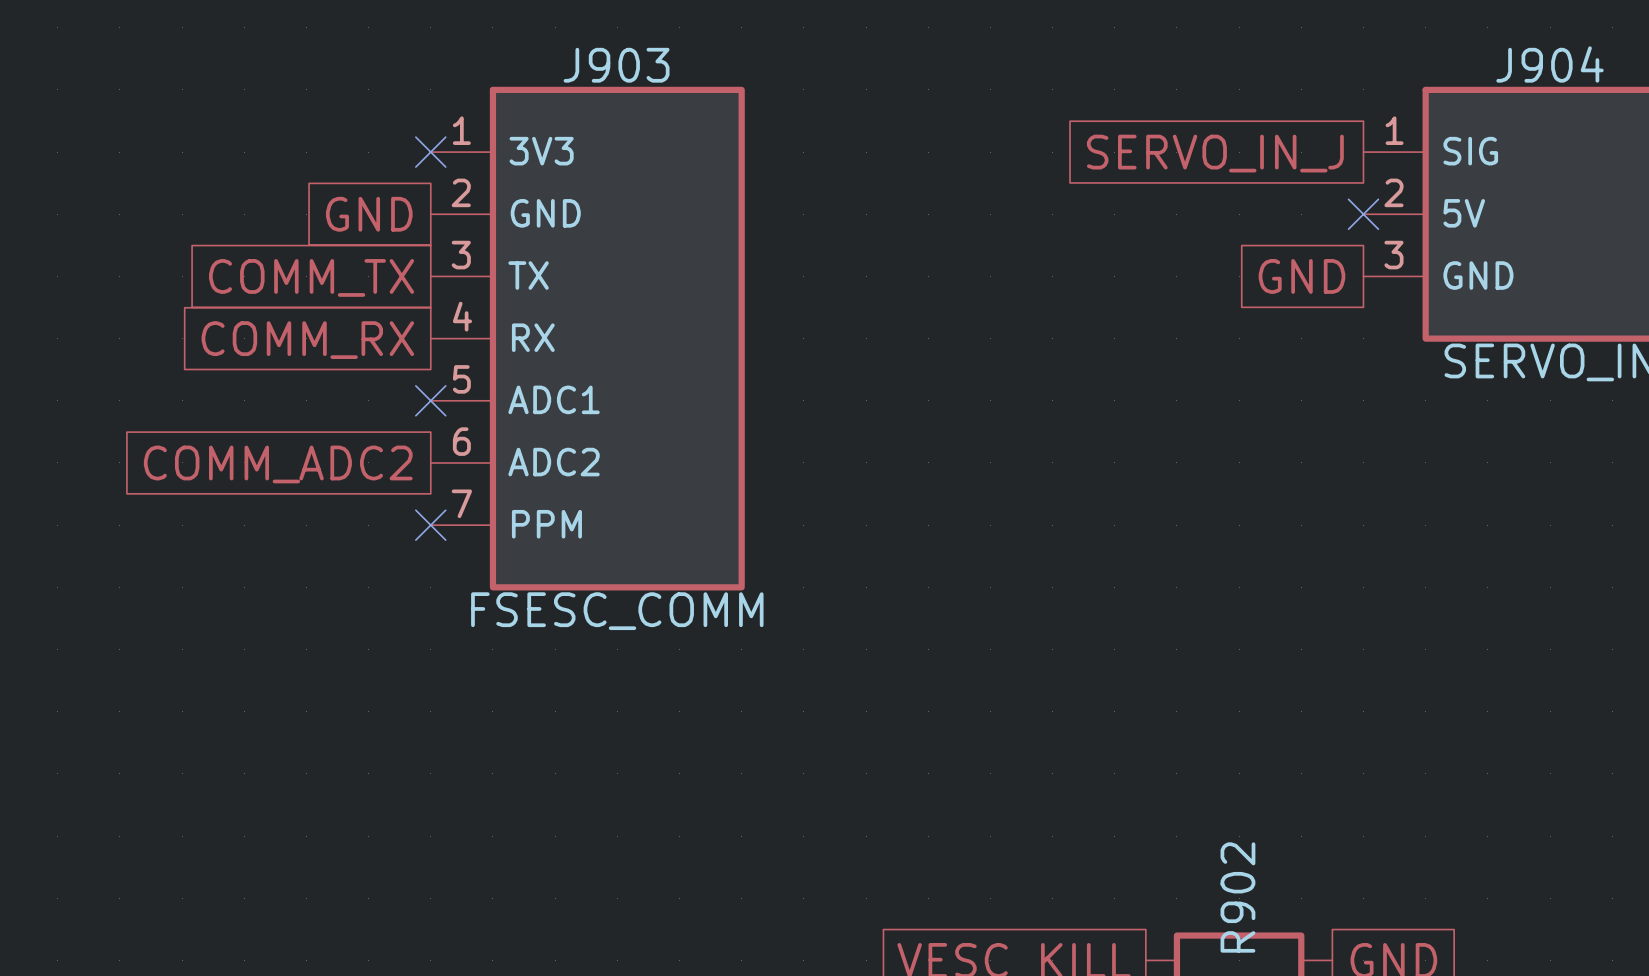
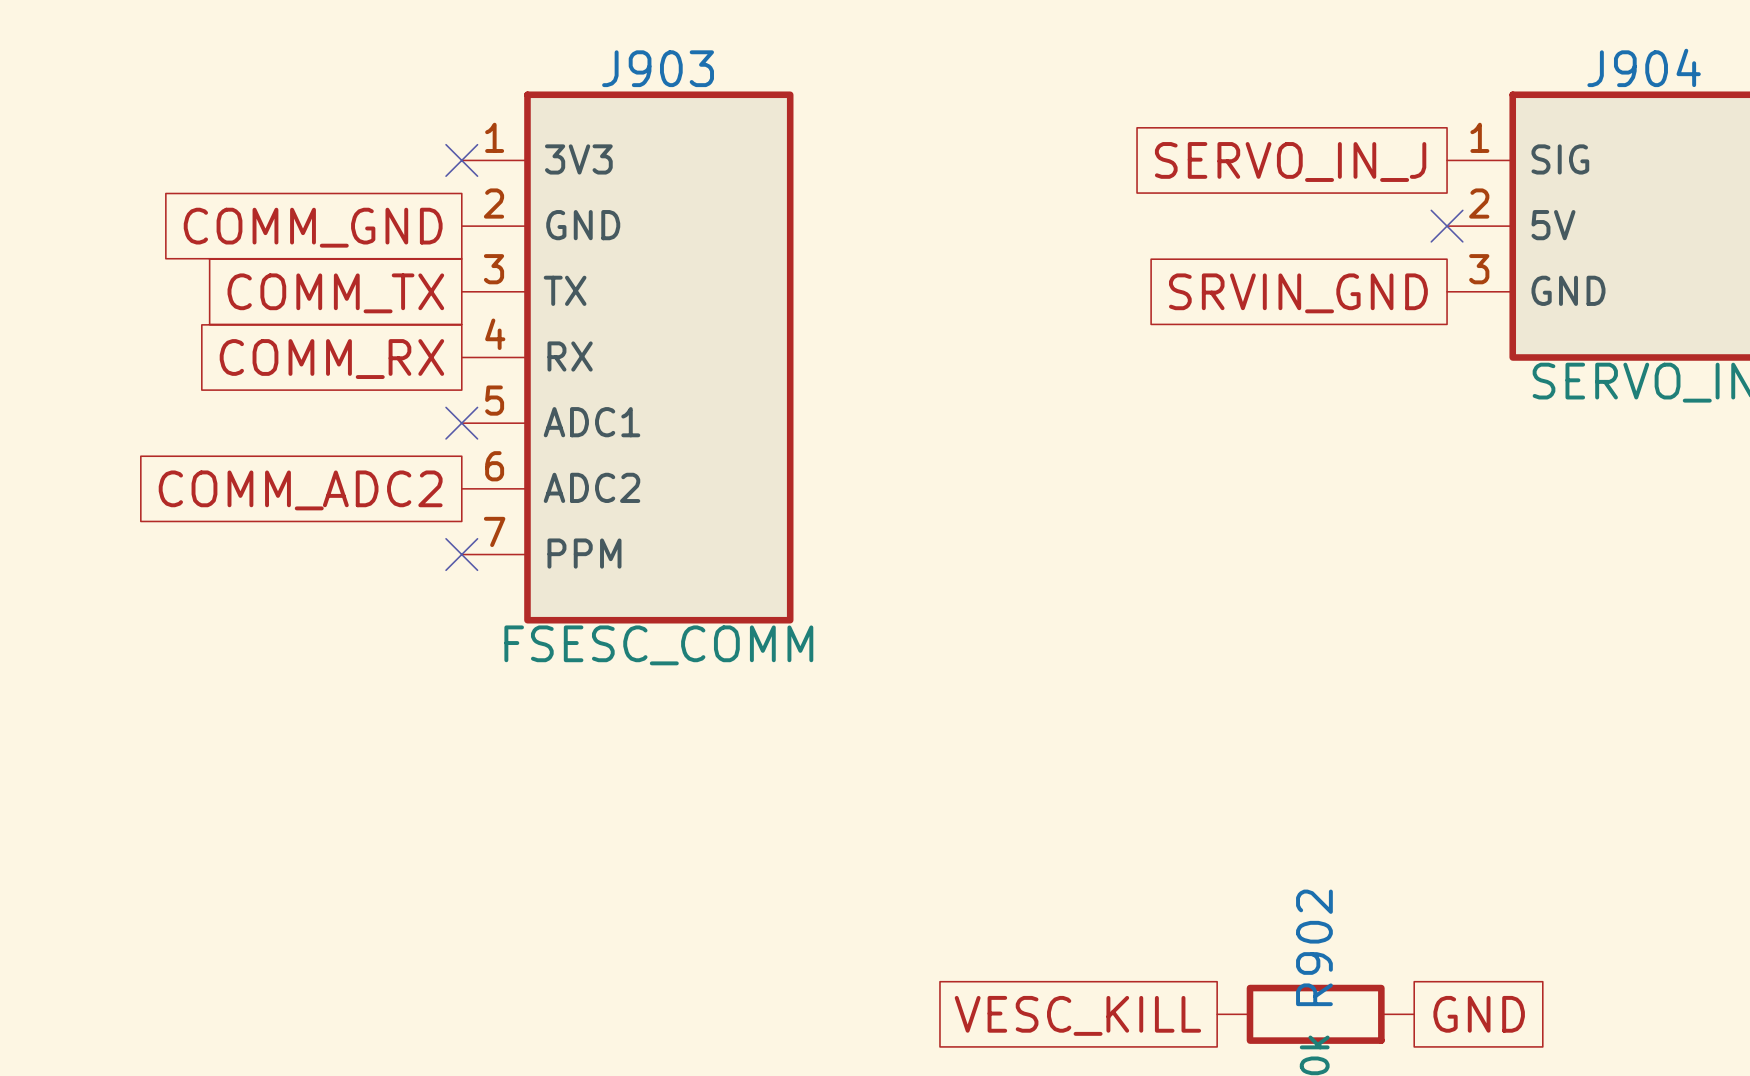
global label: GND (369, 214) -> COMM_GND (313, 227)
global label: GND (1301, 276) -> SRVIN_GND (1298, 293)

